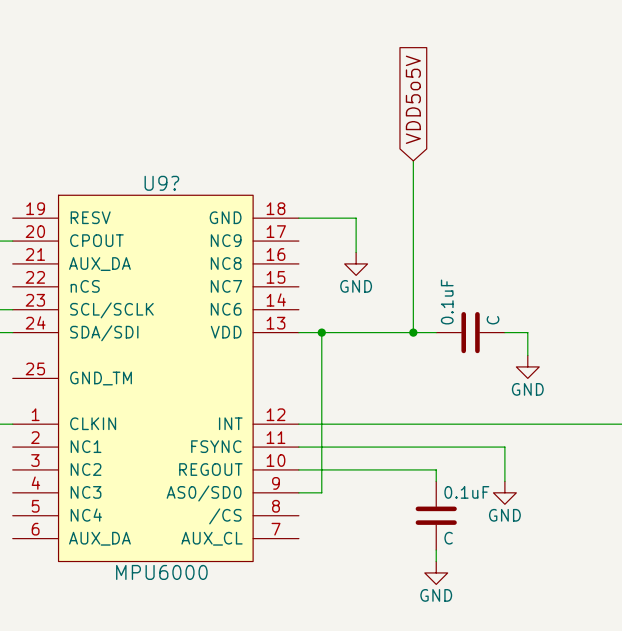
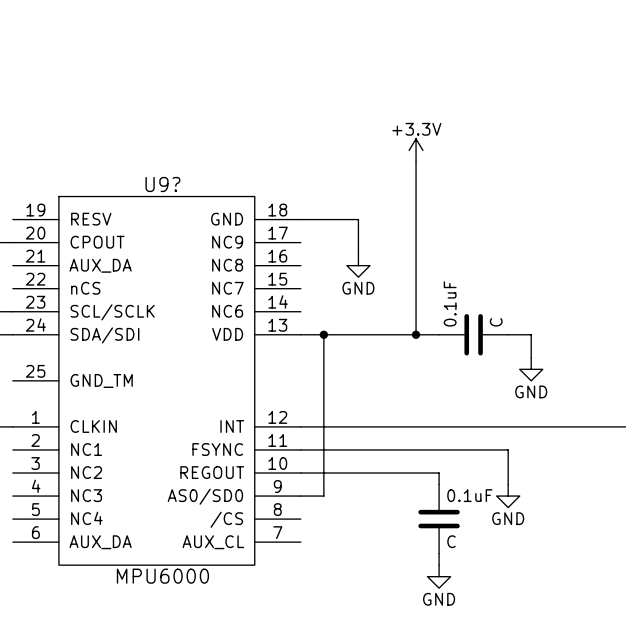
global label: VDD5o5V (413, 99) -> none
power symbol: none -> +3.3V (416, 150)

